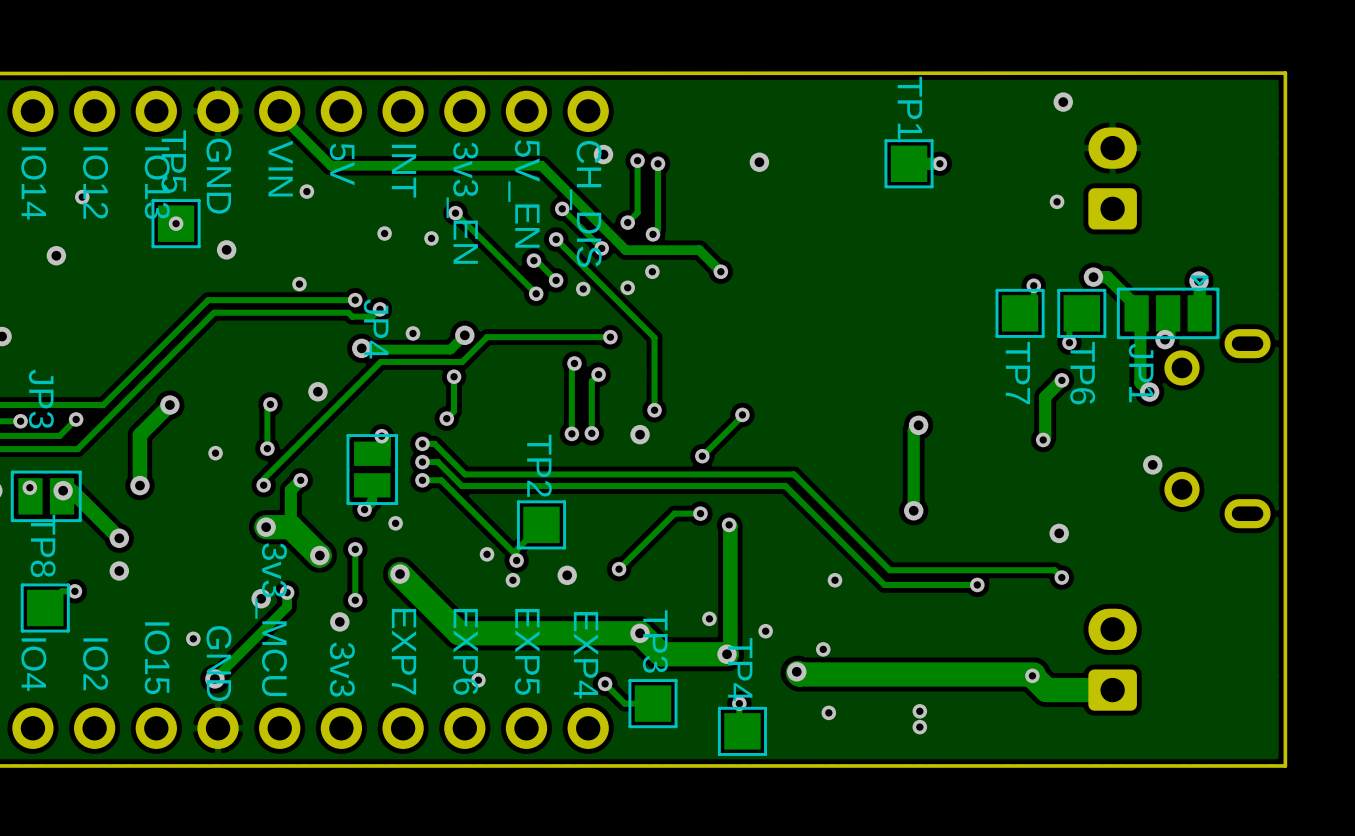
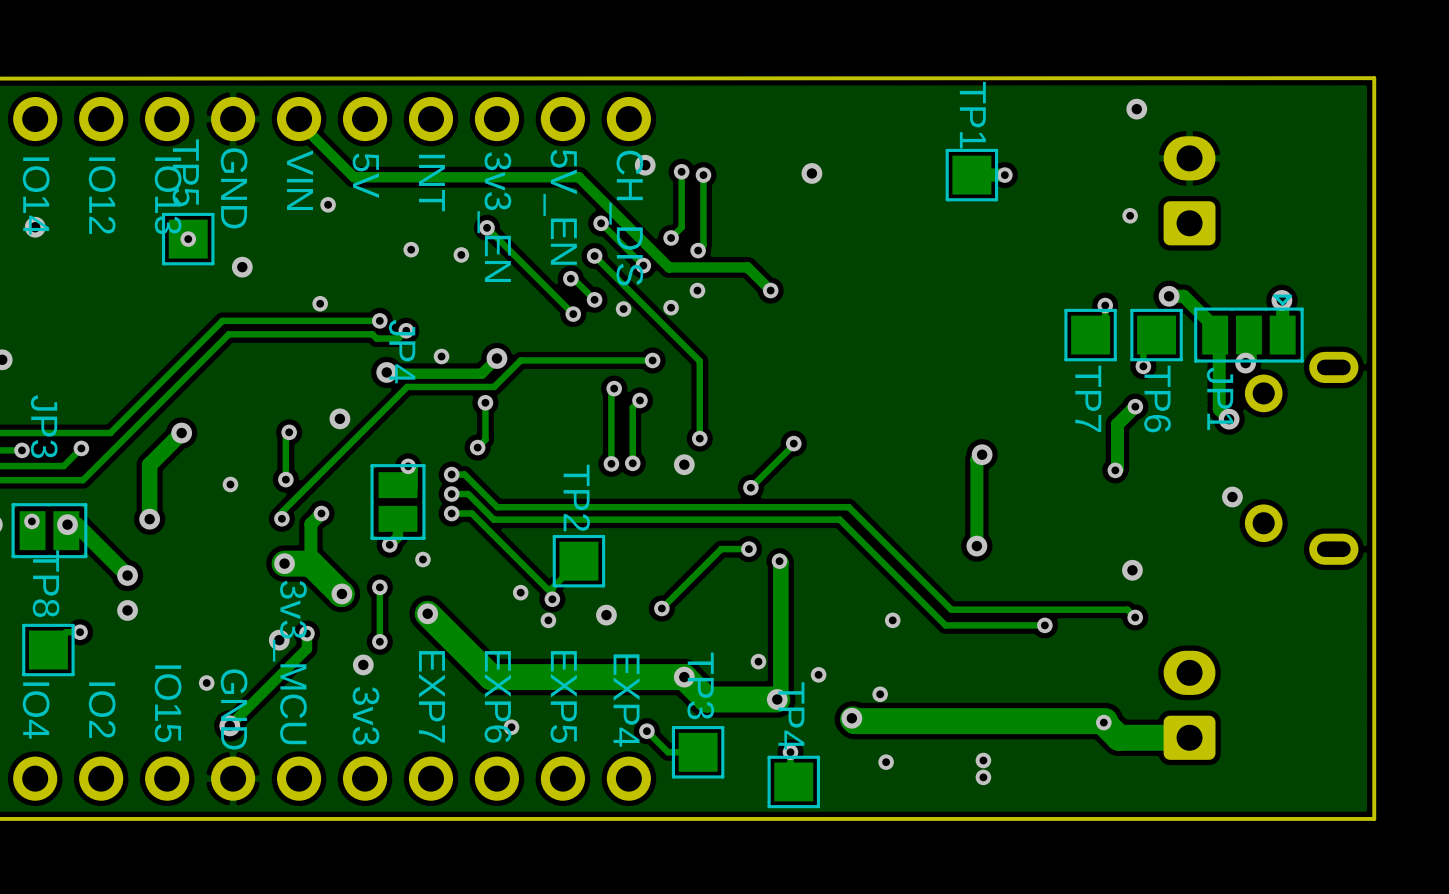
via: (82, 197) -> none
via position: (56, 255) -> (35, 227)

